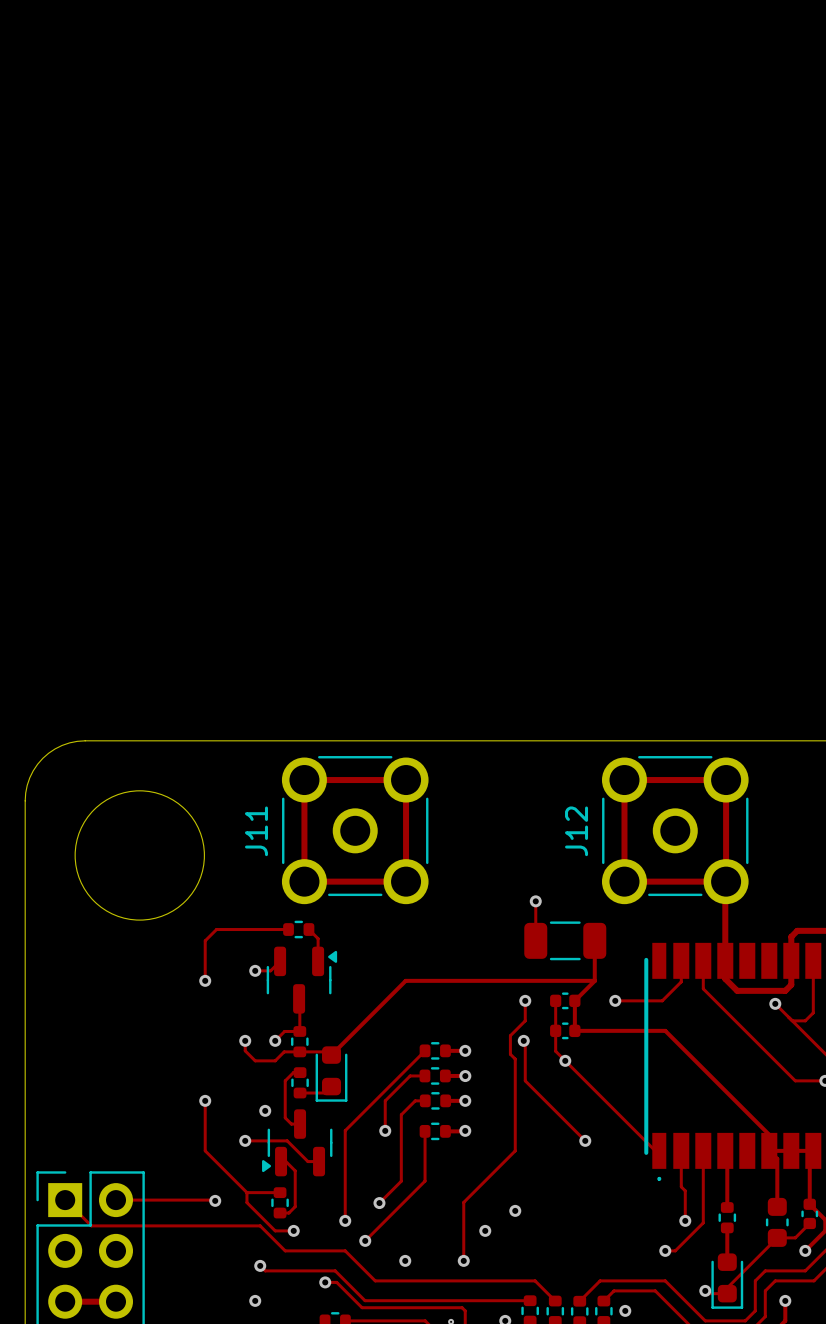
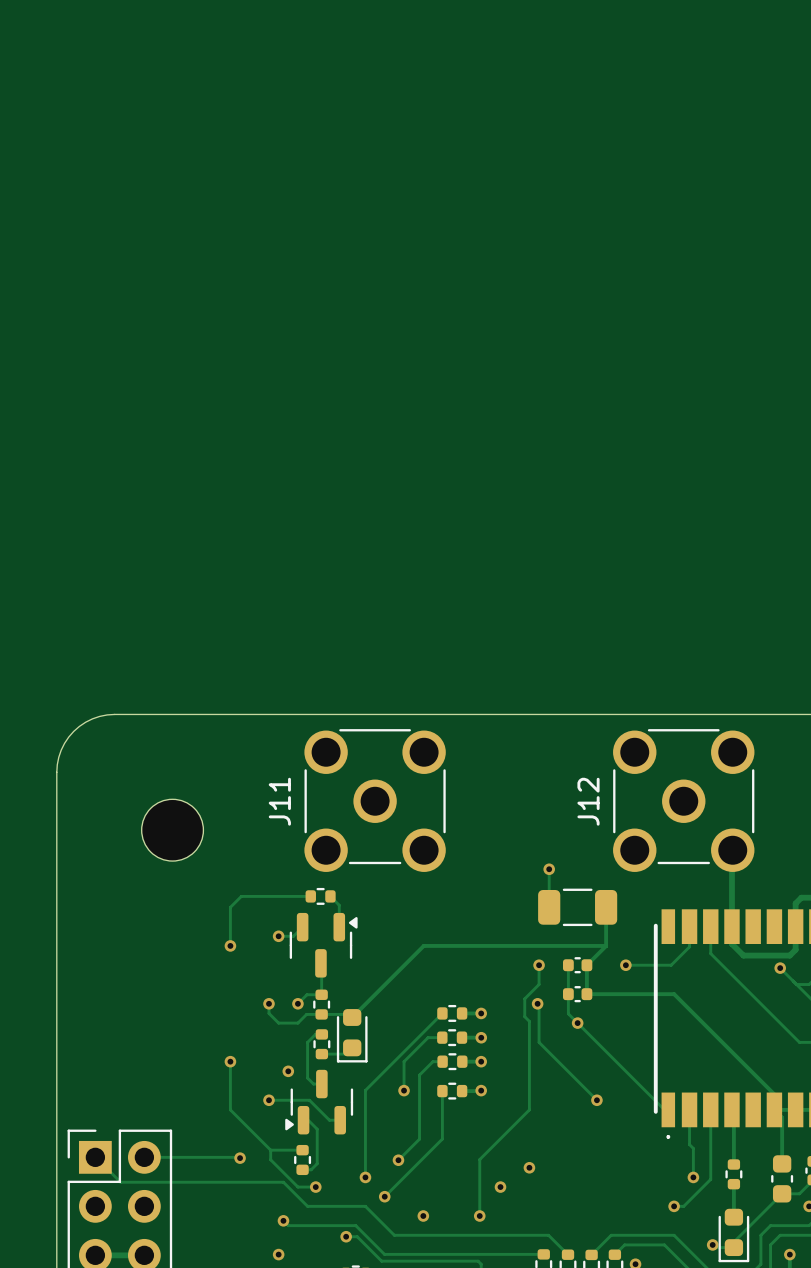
track: (304, 780) (406, 780) (406, 881) (304, 881) (304, 780) -> none
track: (624, 780) (726, 780) (726, 881) (624, 881) (624, 780) -> none
round board edge: [74, 790, 205, 921] -> none
part: none -> (172, 830)

